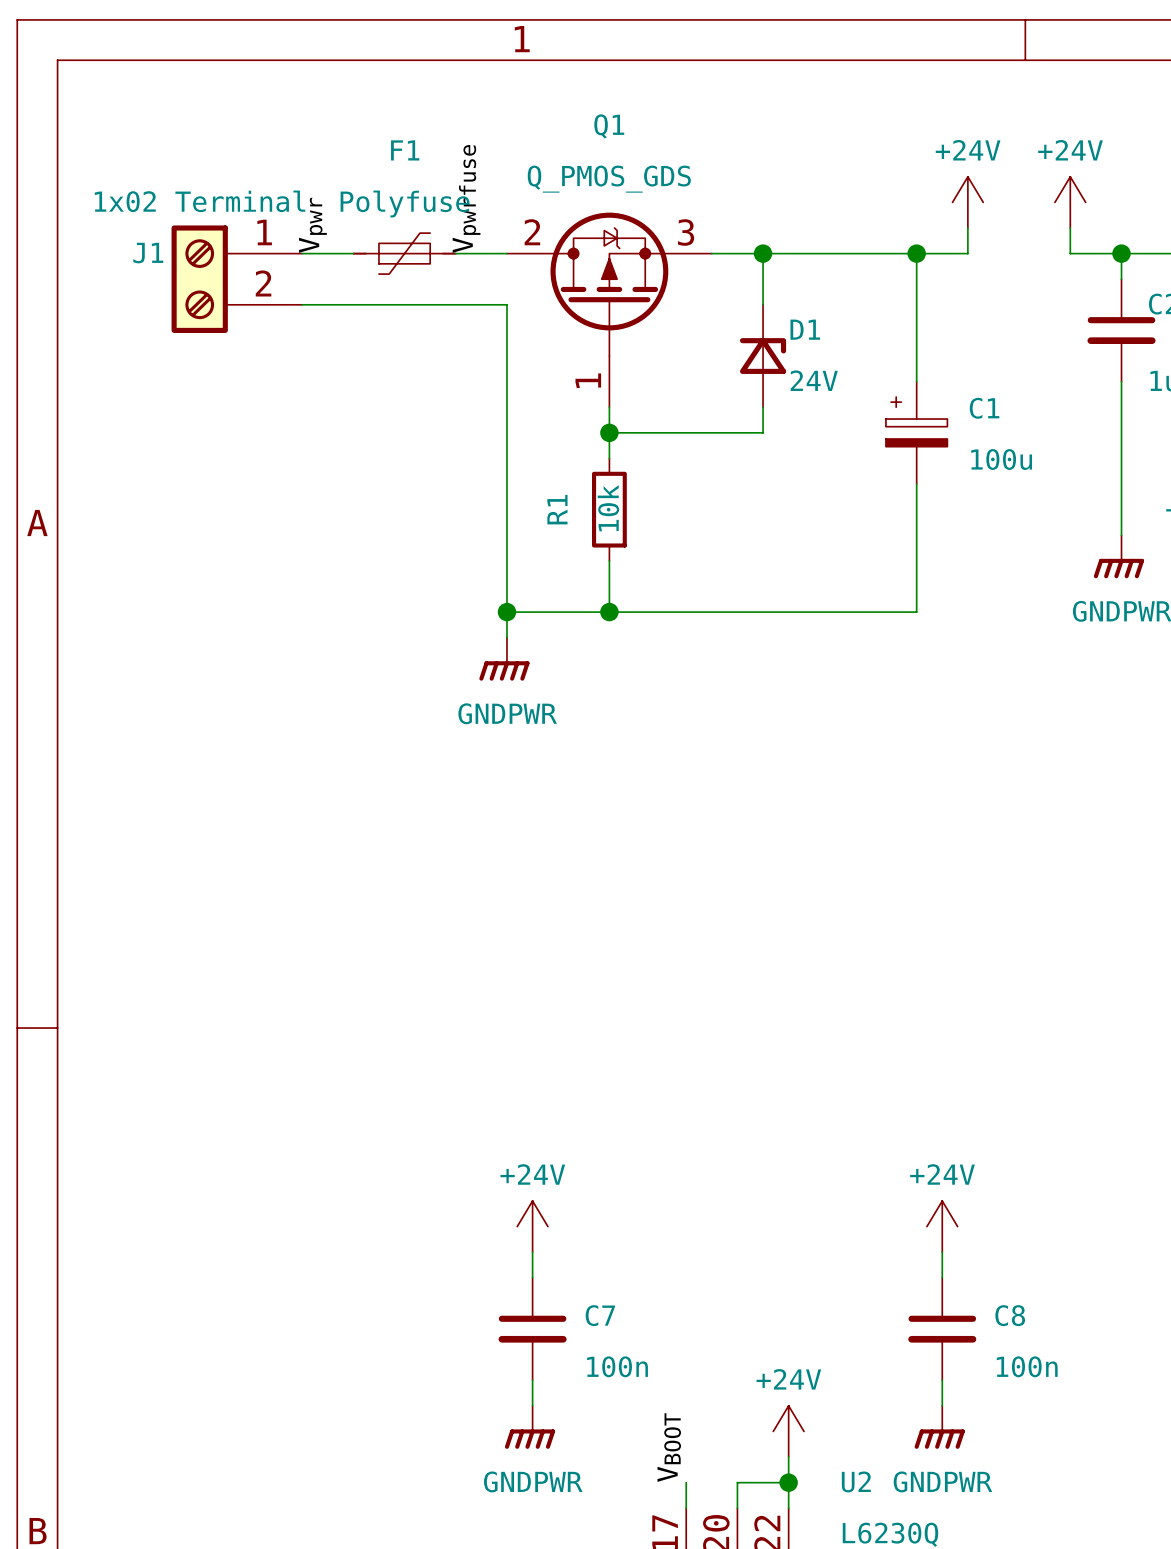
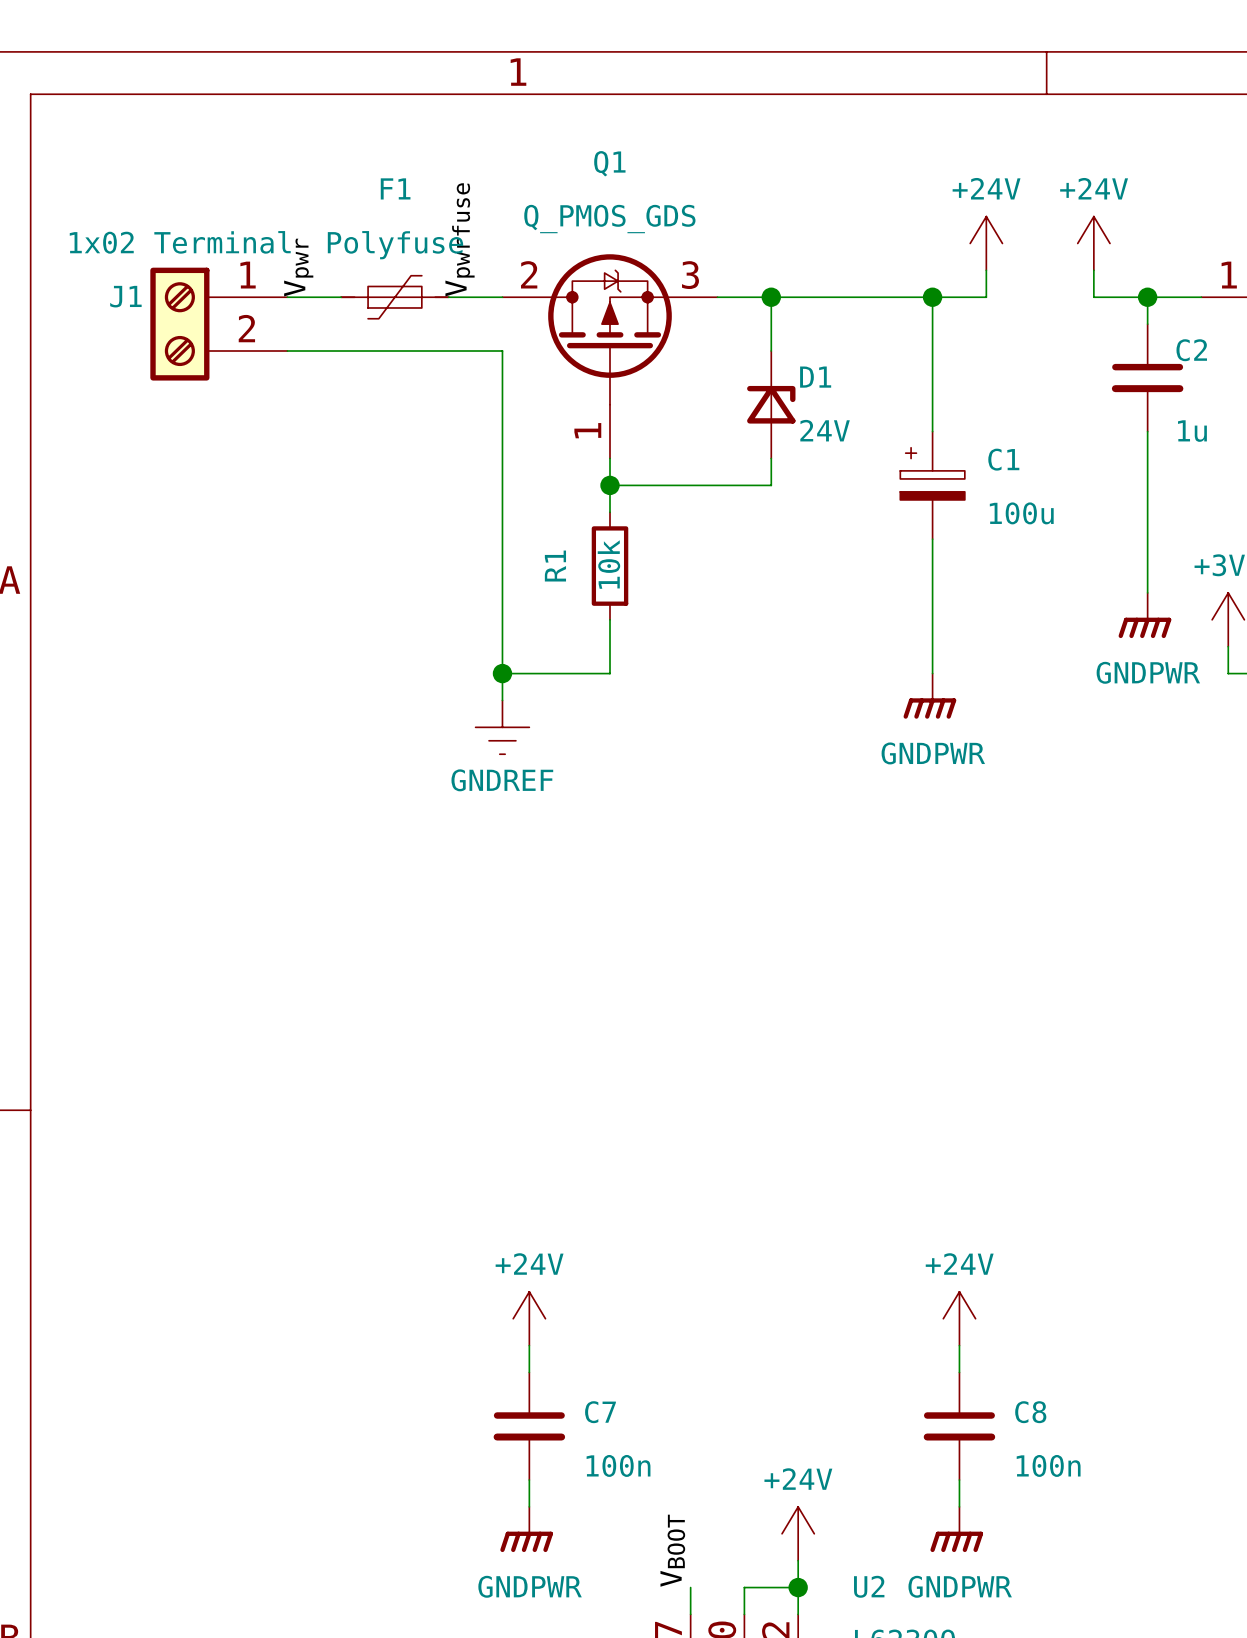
wire: (609, 612) (916, 612) -> none
junction: (609, 612) -> none
power symbol: none -> GNDPWR (929, 696)
power symbol: GNDPWR (504, 659) -> GNDREF (502, 727)

